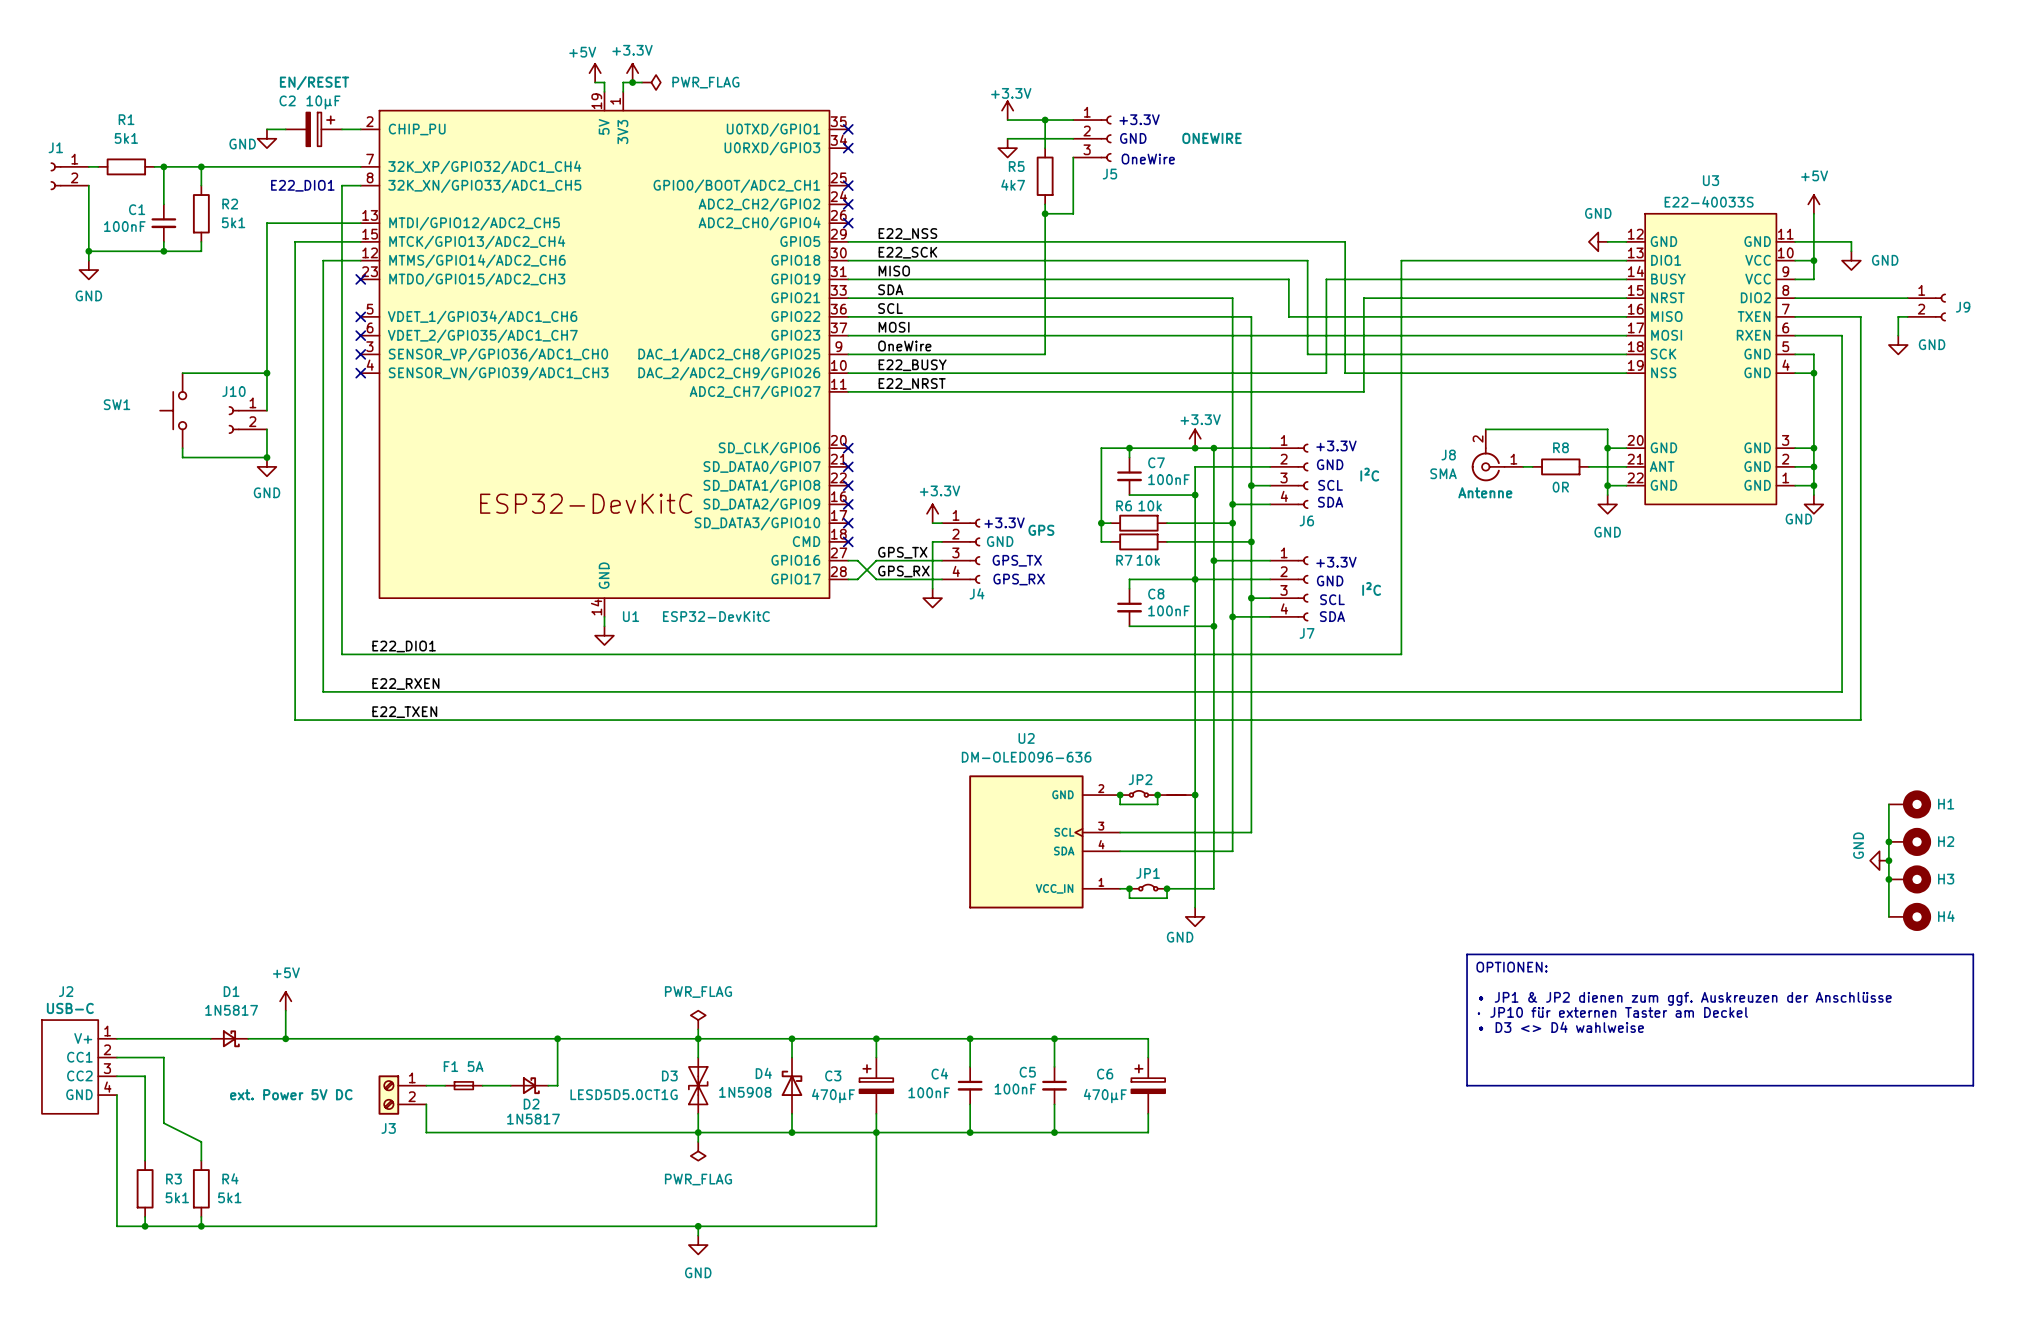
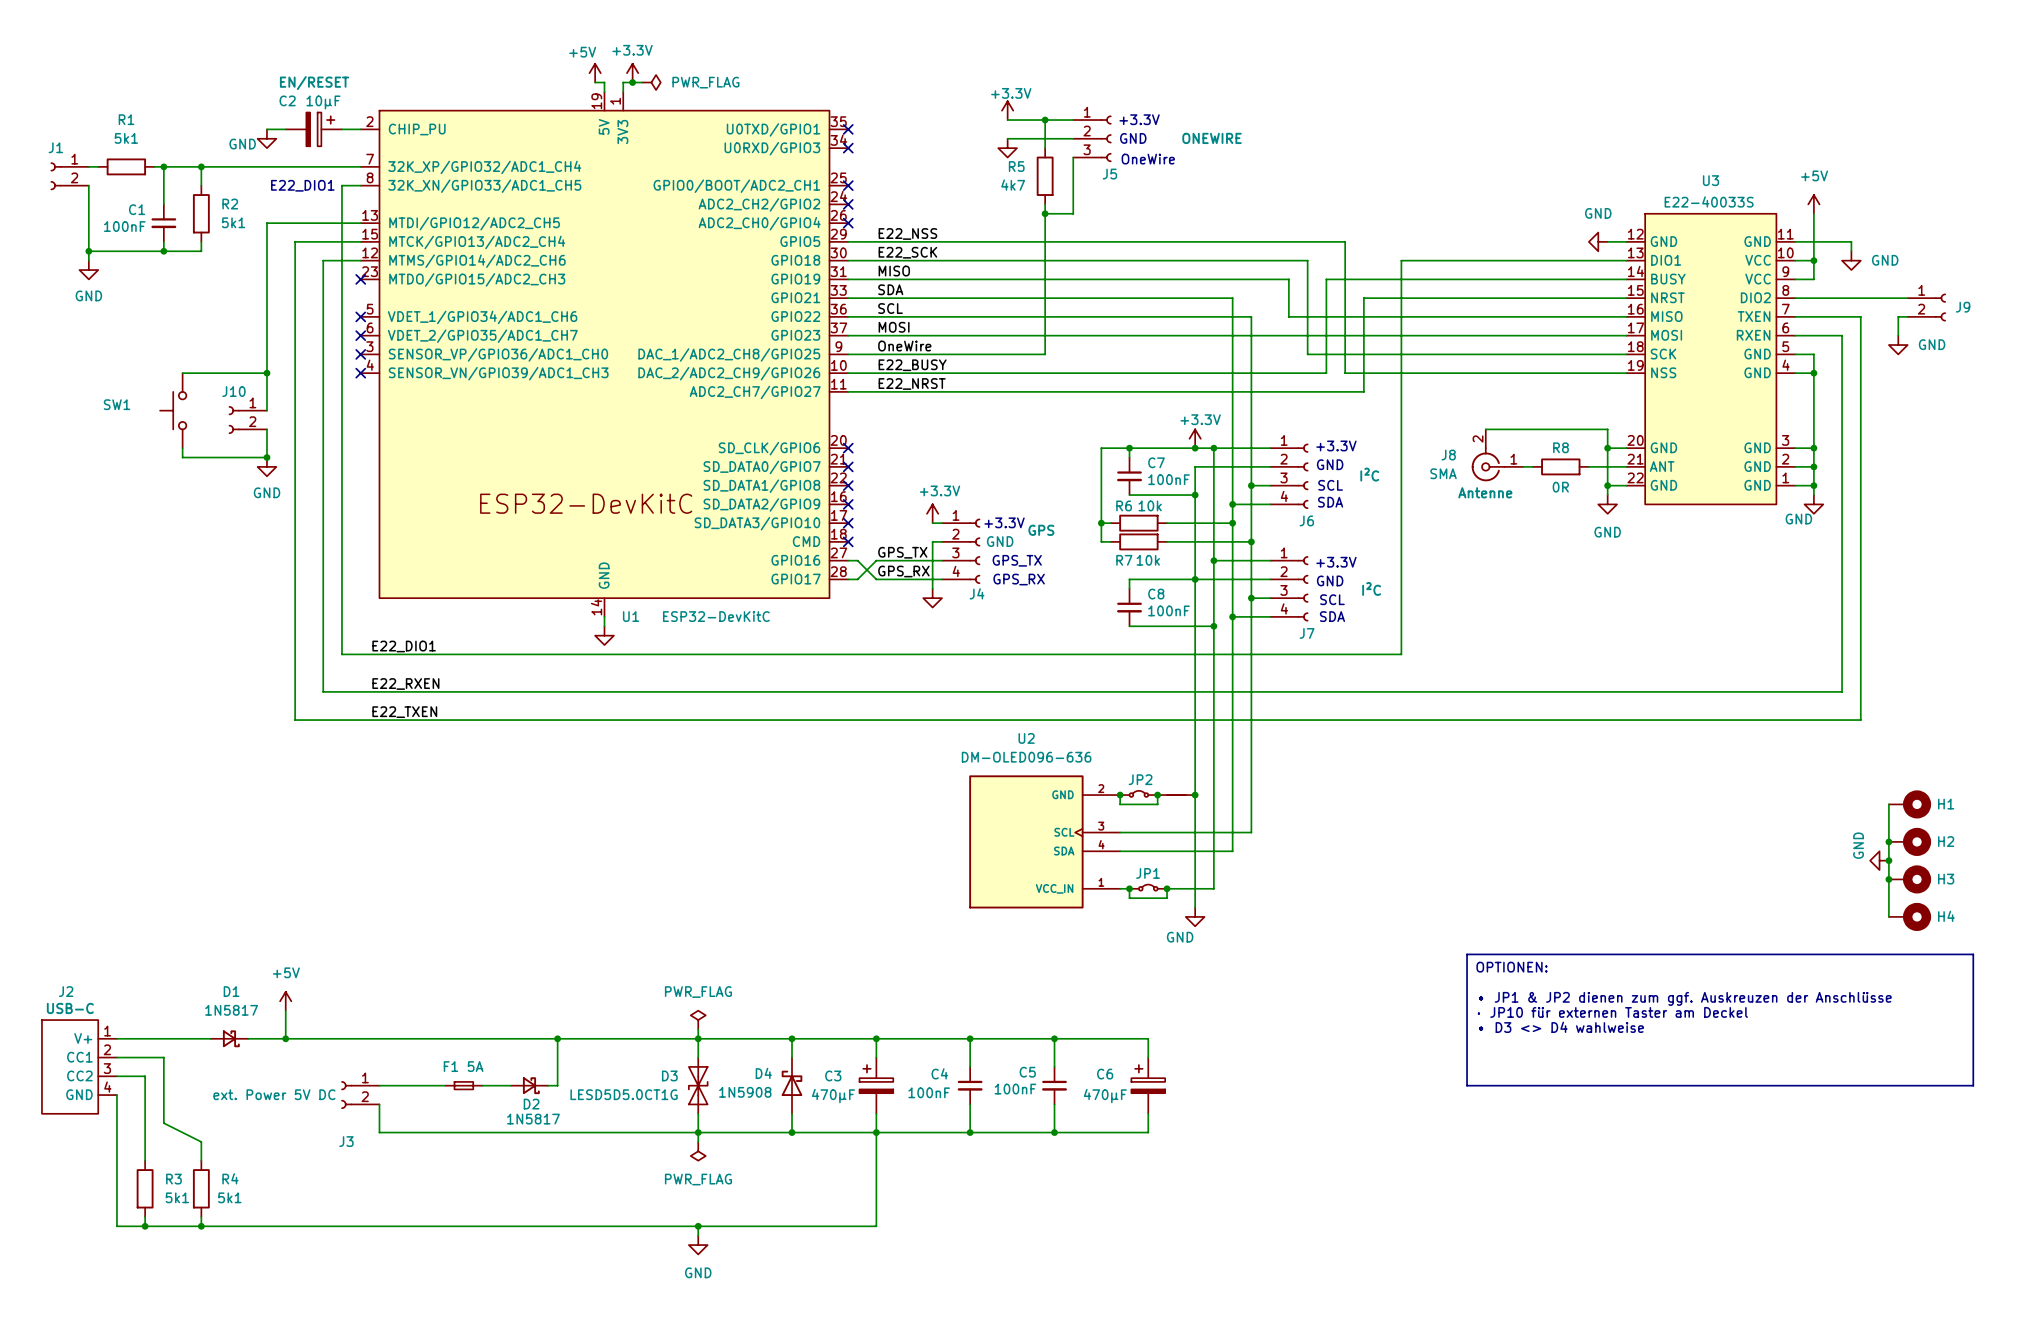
J3 symbol: [378, 1075, 427, 1115] -> [341, 1081, 380, 1109]
J3 text: none -> ext. Power 5V DC (274, 1094)
J3 text: ext. Power 5V DC (291, 1094) -> none
wire: (426, 1104) (426, 1132) -> (379, 1104) (379, 1132) (426, 1132)

